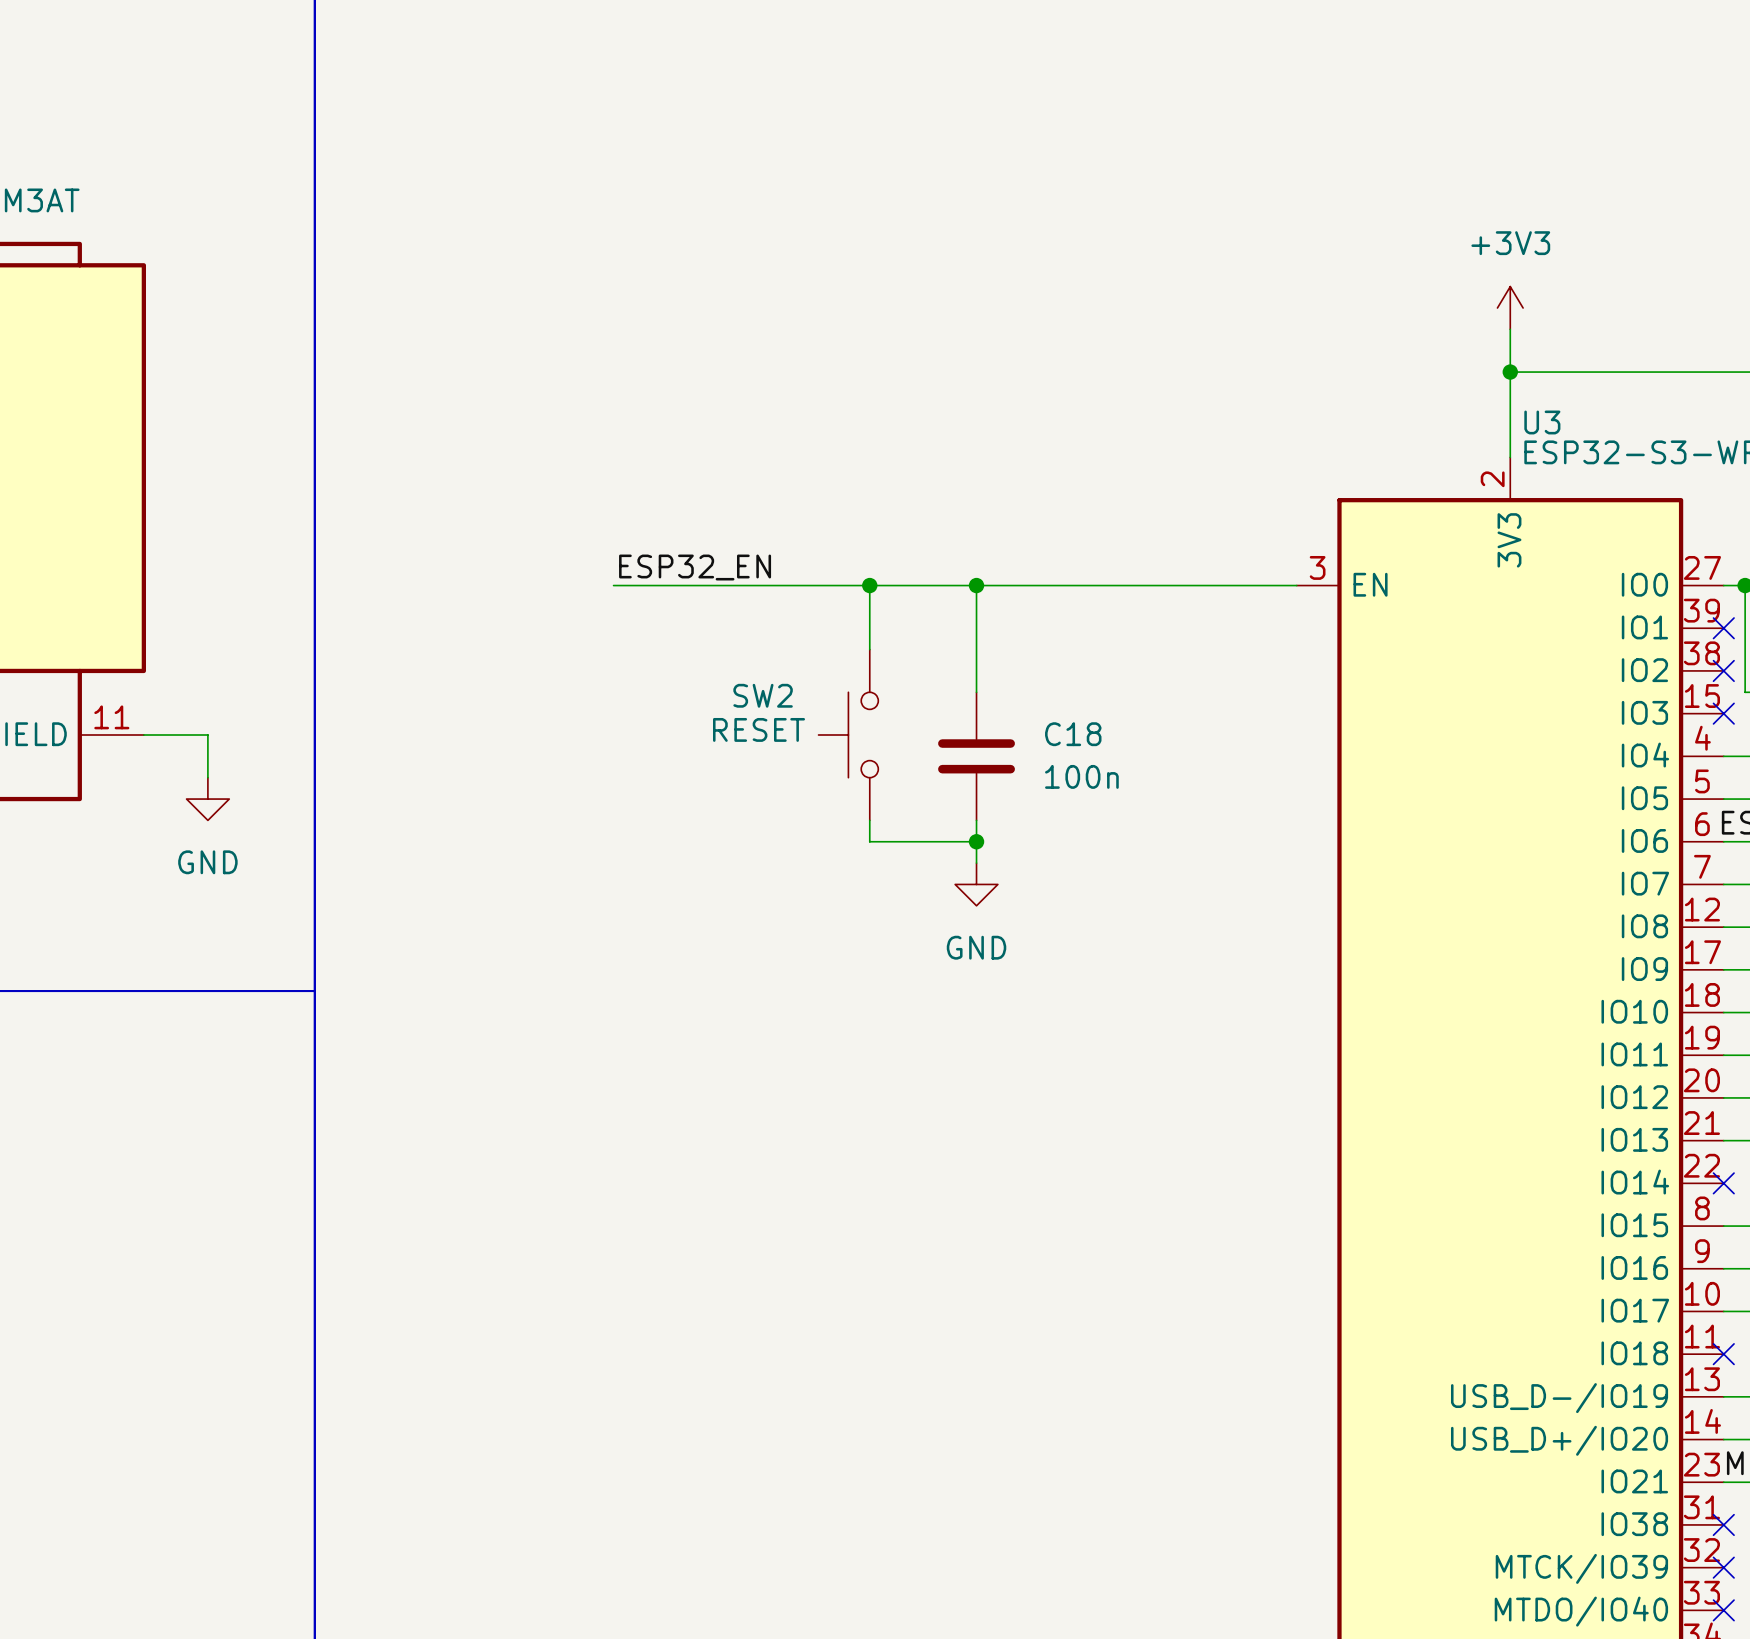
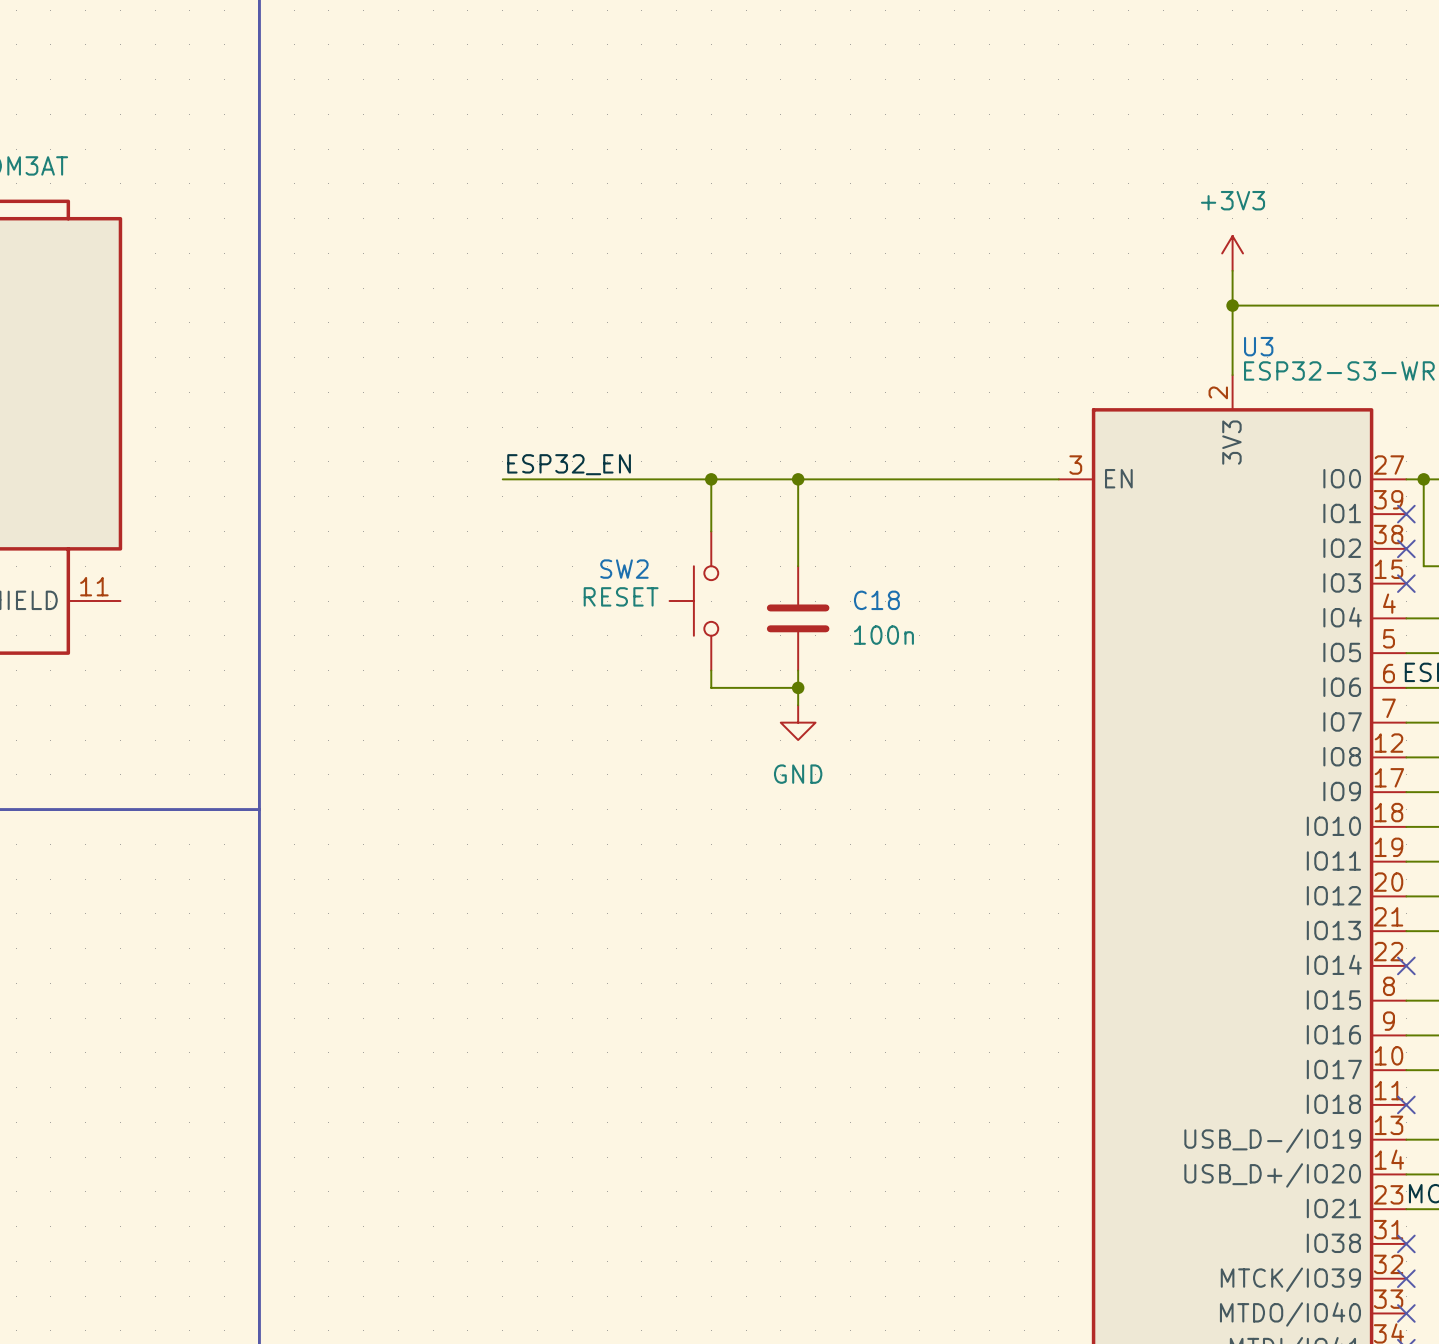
wire: (143, 735) (207, 735) (207, 777) -> none
power symbol: GND (207, 799) -> none

